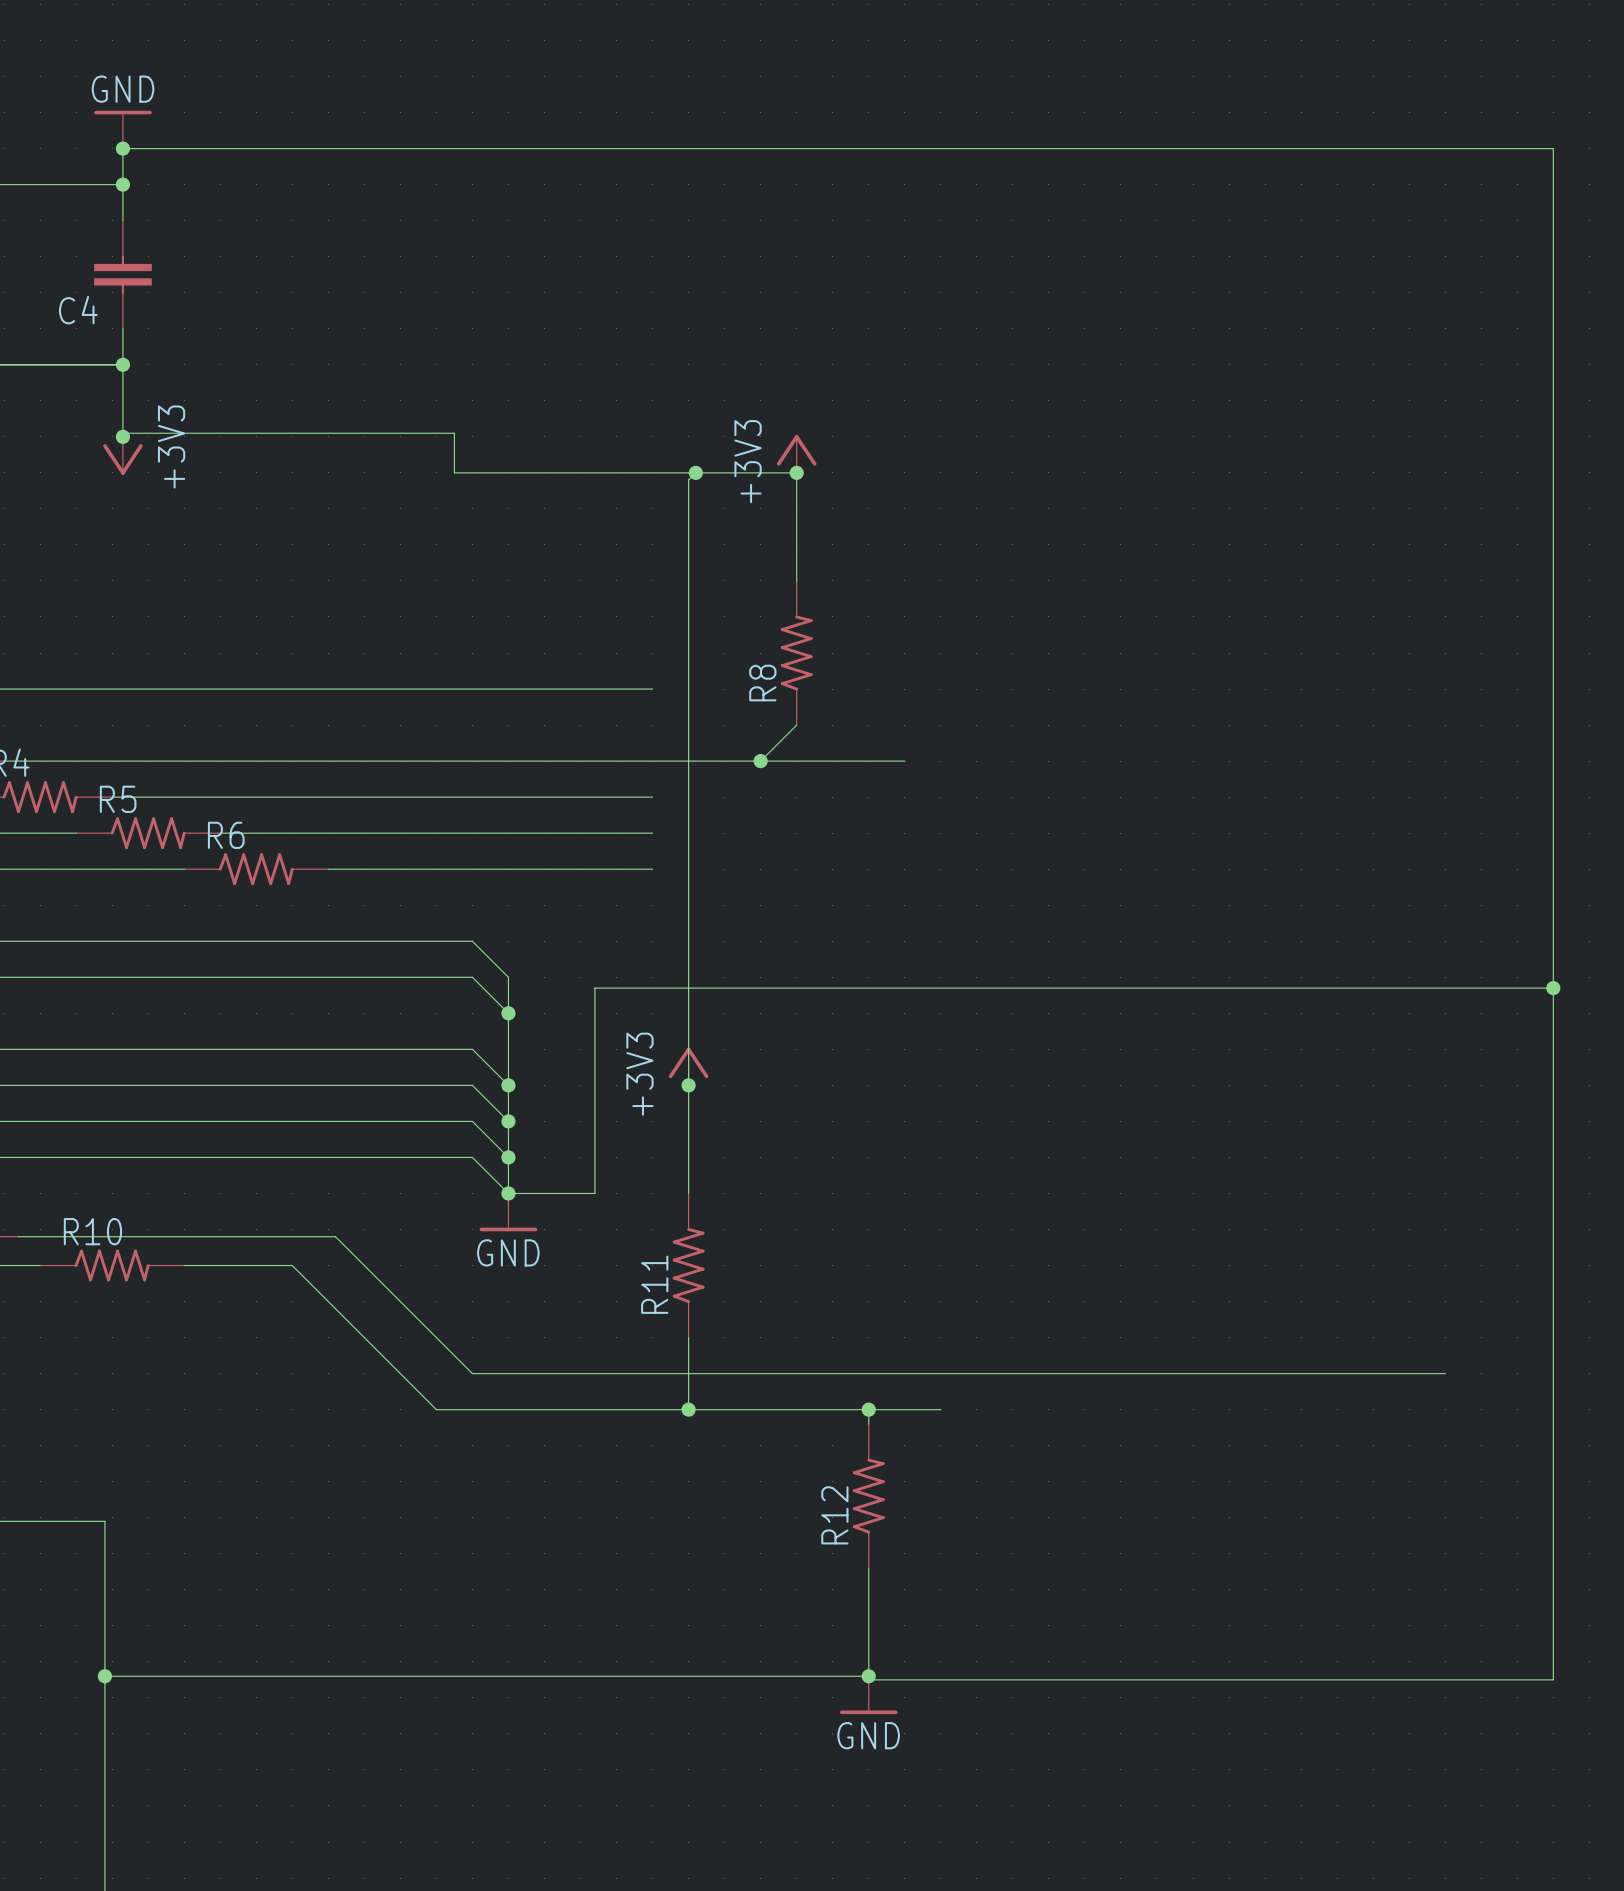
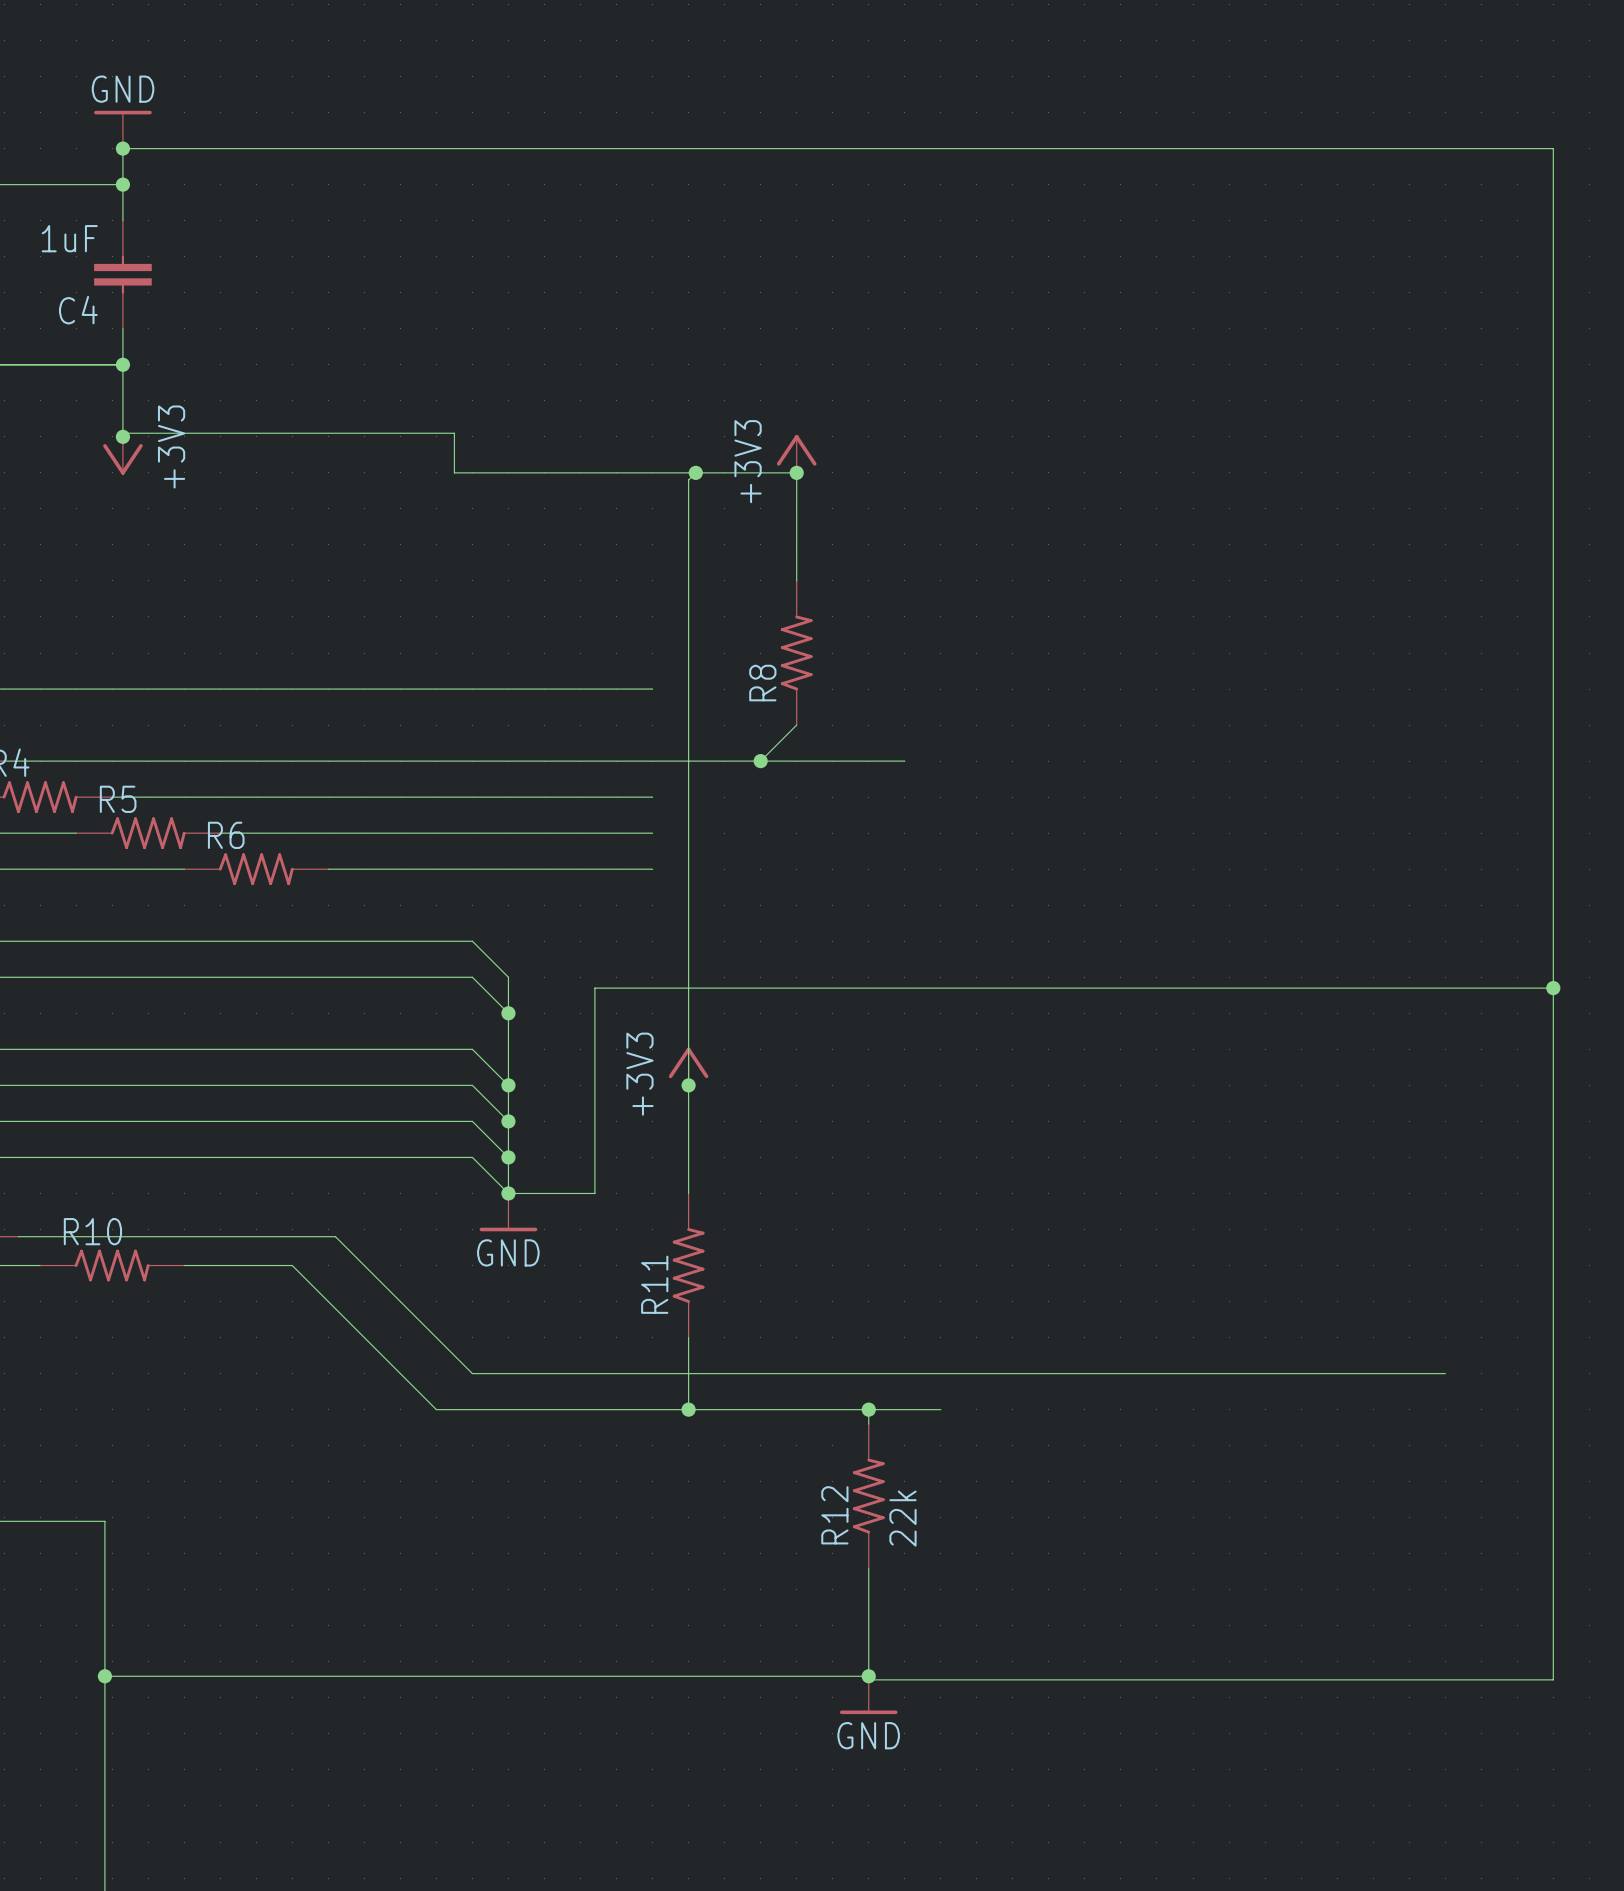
C4 value: none -> 1uF (69, 238)
R12 value: none -> 22k (902, 1518)

